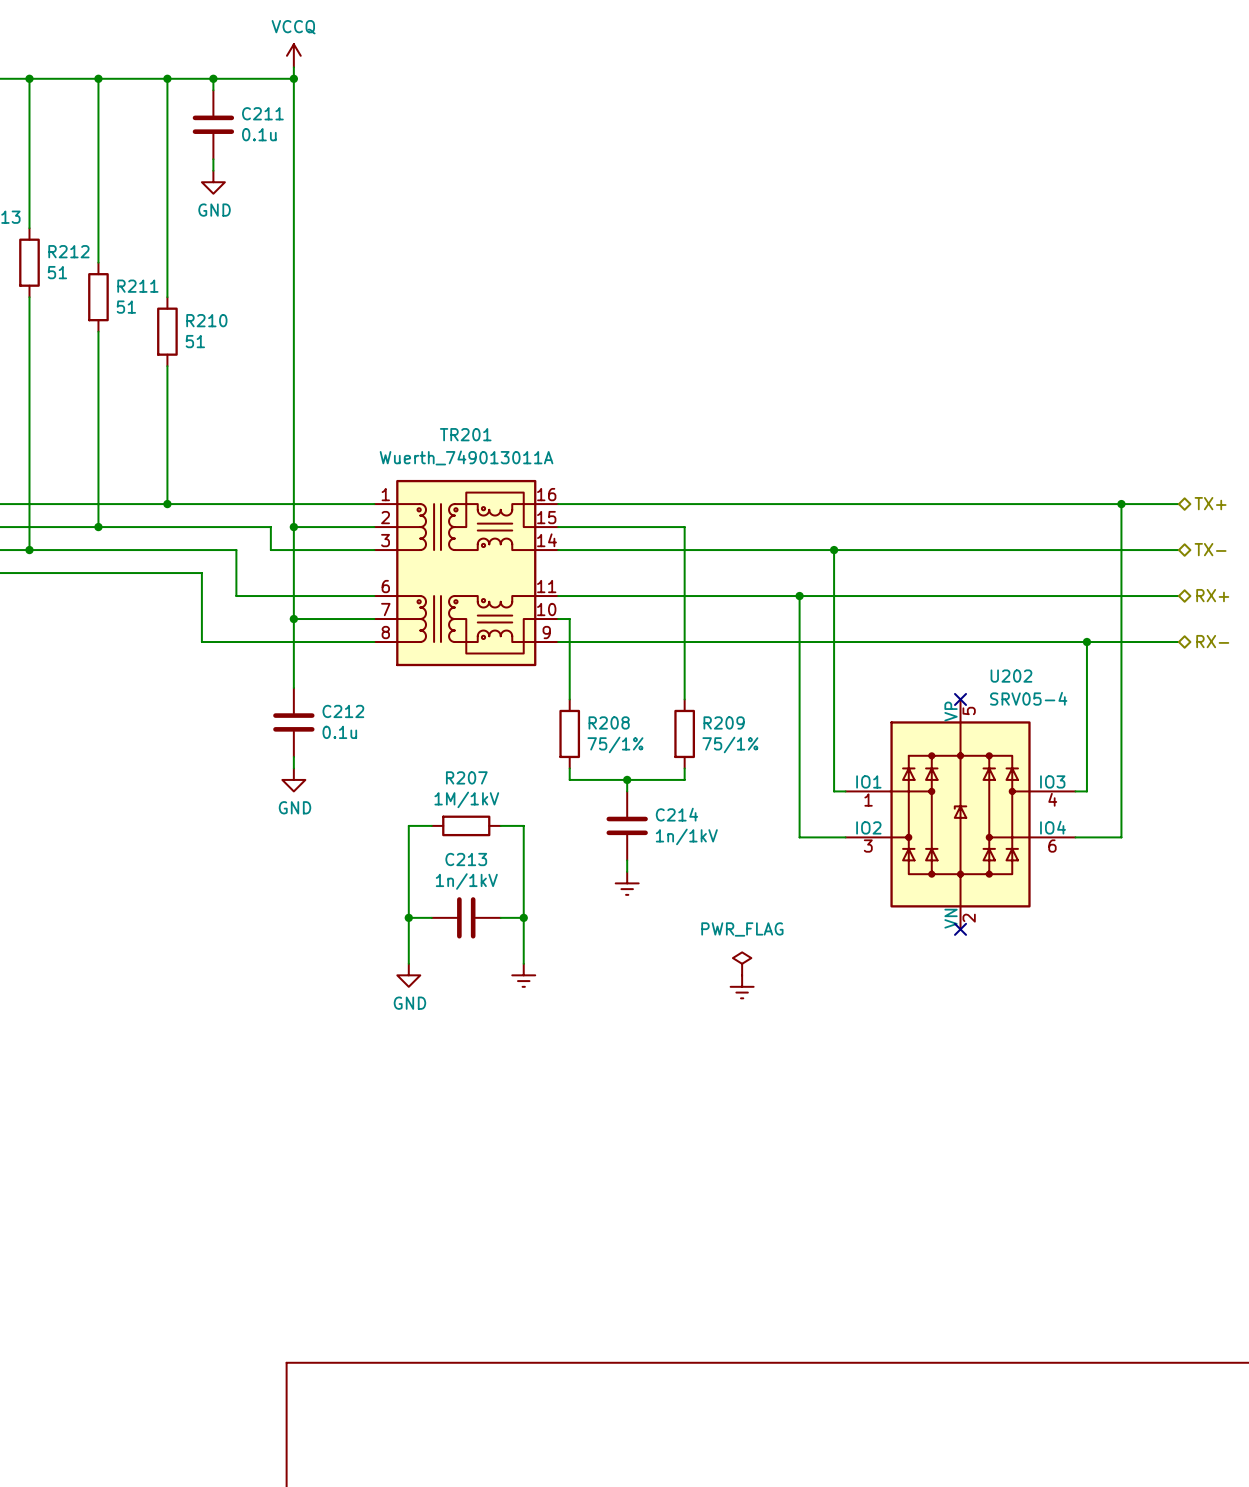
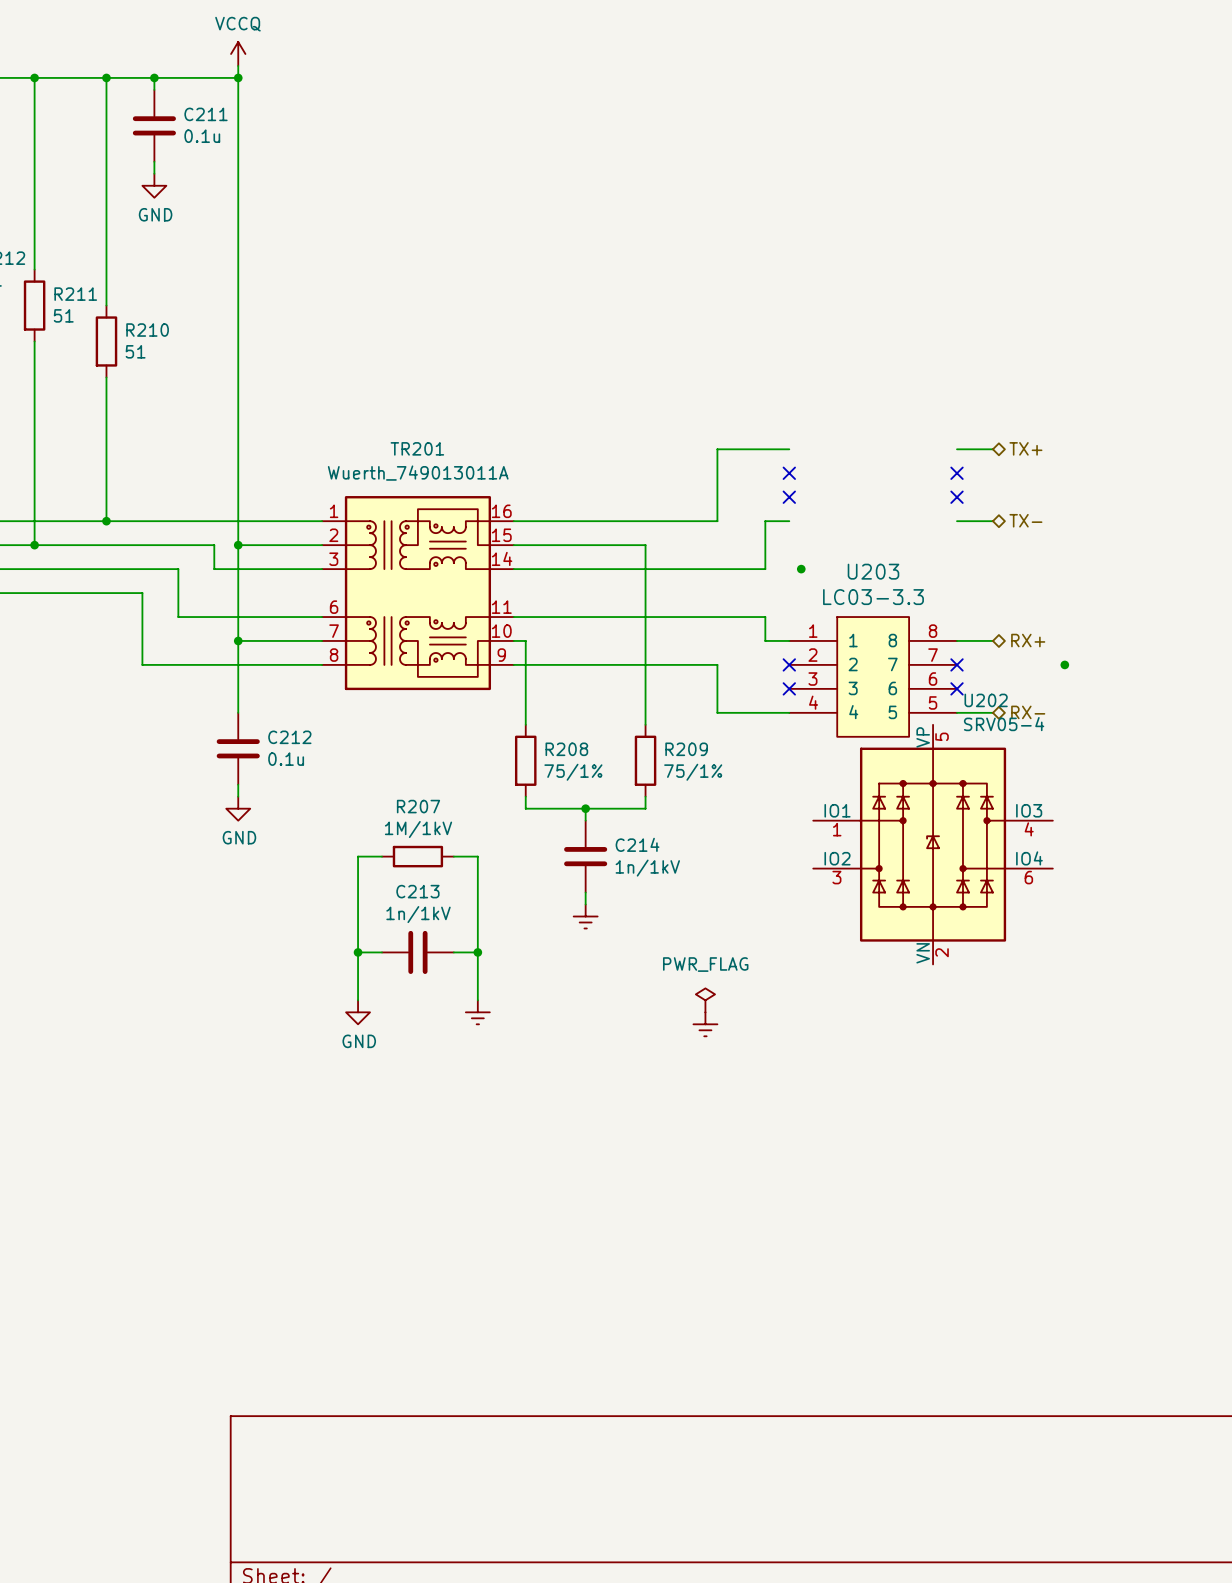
wire: none -> (789, 449) (717, 449) (717, 521)
wire: none -> (957, 449) (992, 449)
no-connect mark: none -> (789, 473)
no-connect mark: none -> (957, 473)
no-connect mark: none -> (789, 497)
no-connect mark: none -> (957, 497)
hierarchical label position: TX+ (1210, 503) -> TX+ (1025, 448)
wire: (753, 504) (799, 504) -> (765, 569) (765, 521)
wire: (822, 504) (983, 504) -> none
wire: (1017, 504) (1178, 504) -> none
wire: (1121, 504) (1121, 837) (1075, 837) -> none
junction: (1121, 504) -> none
hierarchical label position: TX- (1210, 549) -> TX- (1025, 520)
wire: (799, 550) (1178, 550) -> none
wire: (834, 550) (834, 791) (845, 791) -> none
hierarchical label position: RX+ (1212, 595) -> RX+ (1028, 640)
wire: (799, 596) (1178, 596) -> none
junction: (799, 596) -> none
wire: (799, 619) (799, 837) (845, 837) -> (765, 640) (789, 640)
wire: none -> (957, 640) (992, 640)
hierarchical label position: RX- (1212, 641) -> RX- (1028, 712)
wire: (753, 642) (1178, 642) -> (717, 664) (717, 712) (789, 712)
no-connect mark: none -> (789, 664)
no-connect mark: none -> (957, 664)
wire: (1086, 642) (1086, 791) (1075, 791) -> none
U203: none -> LC03-3.3 (873, 676)
no-connect mark: none -> (789, 688)
no-connect mark: none -> (957, 688)
wire: none -> (957, 712) (992, 712)
no-connect mark: (960, 699) -> none
no-connect mark: (960, 929) -> none

